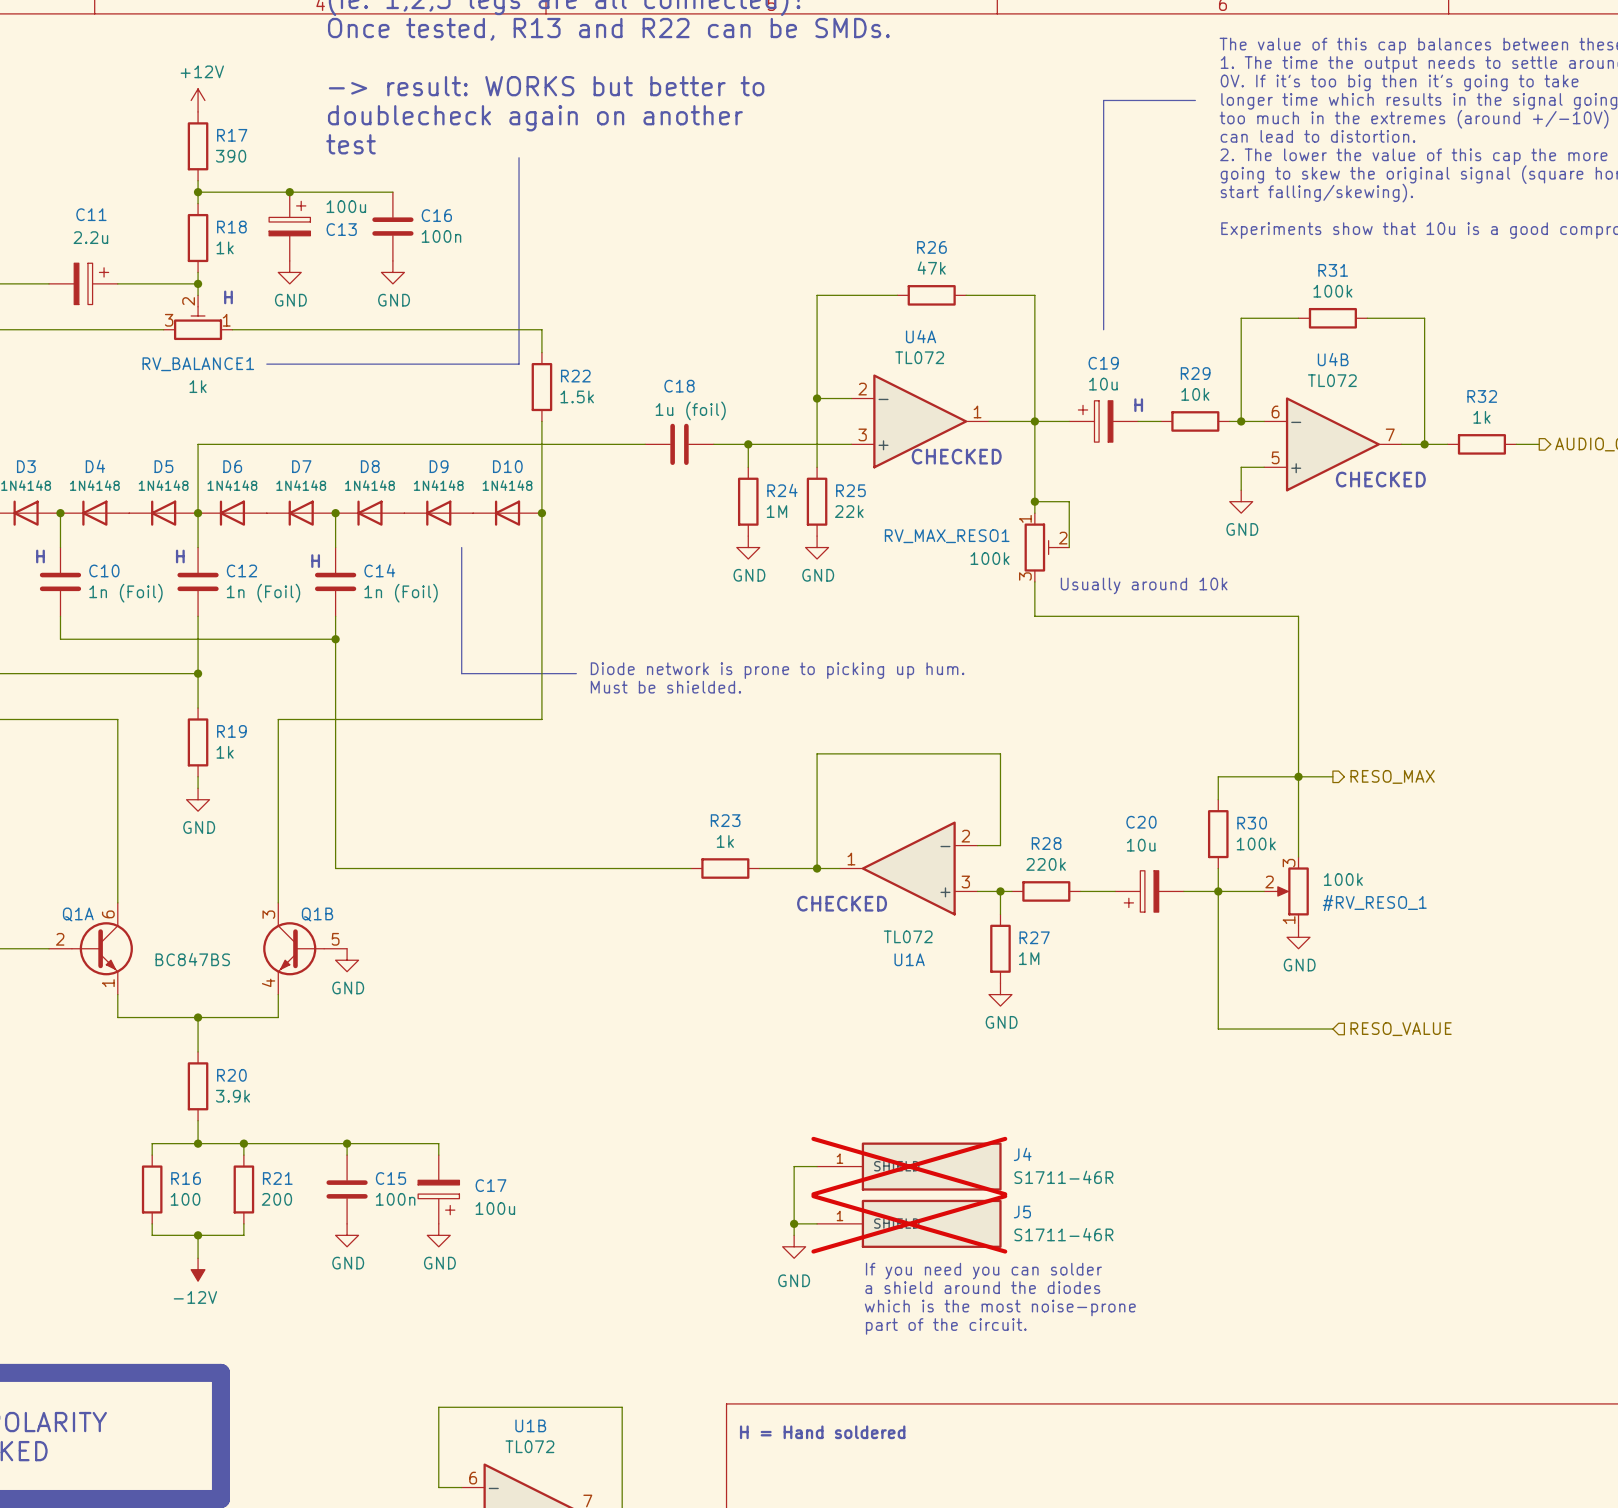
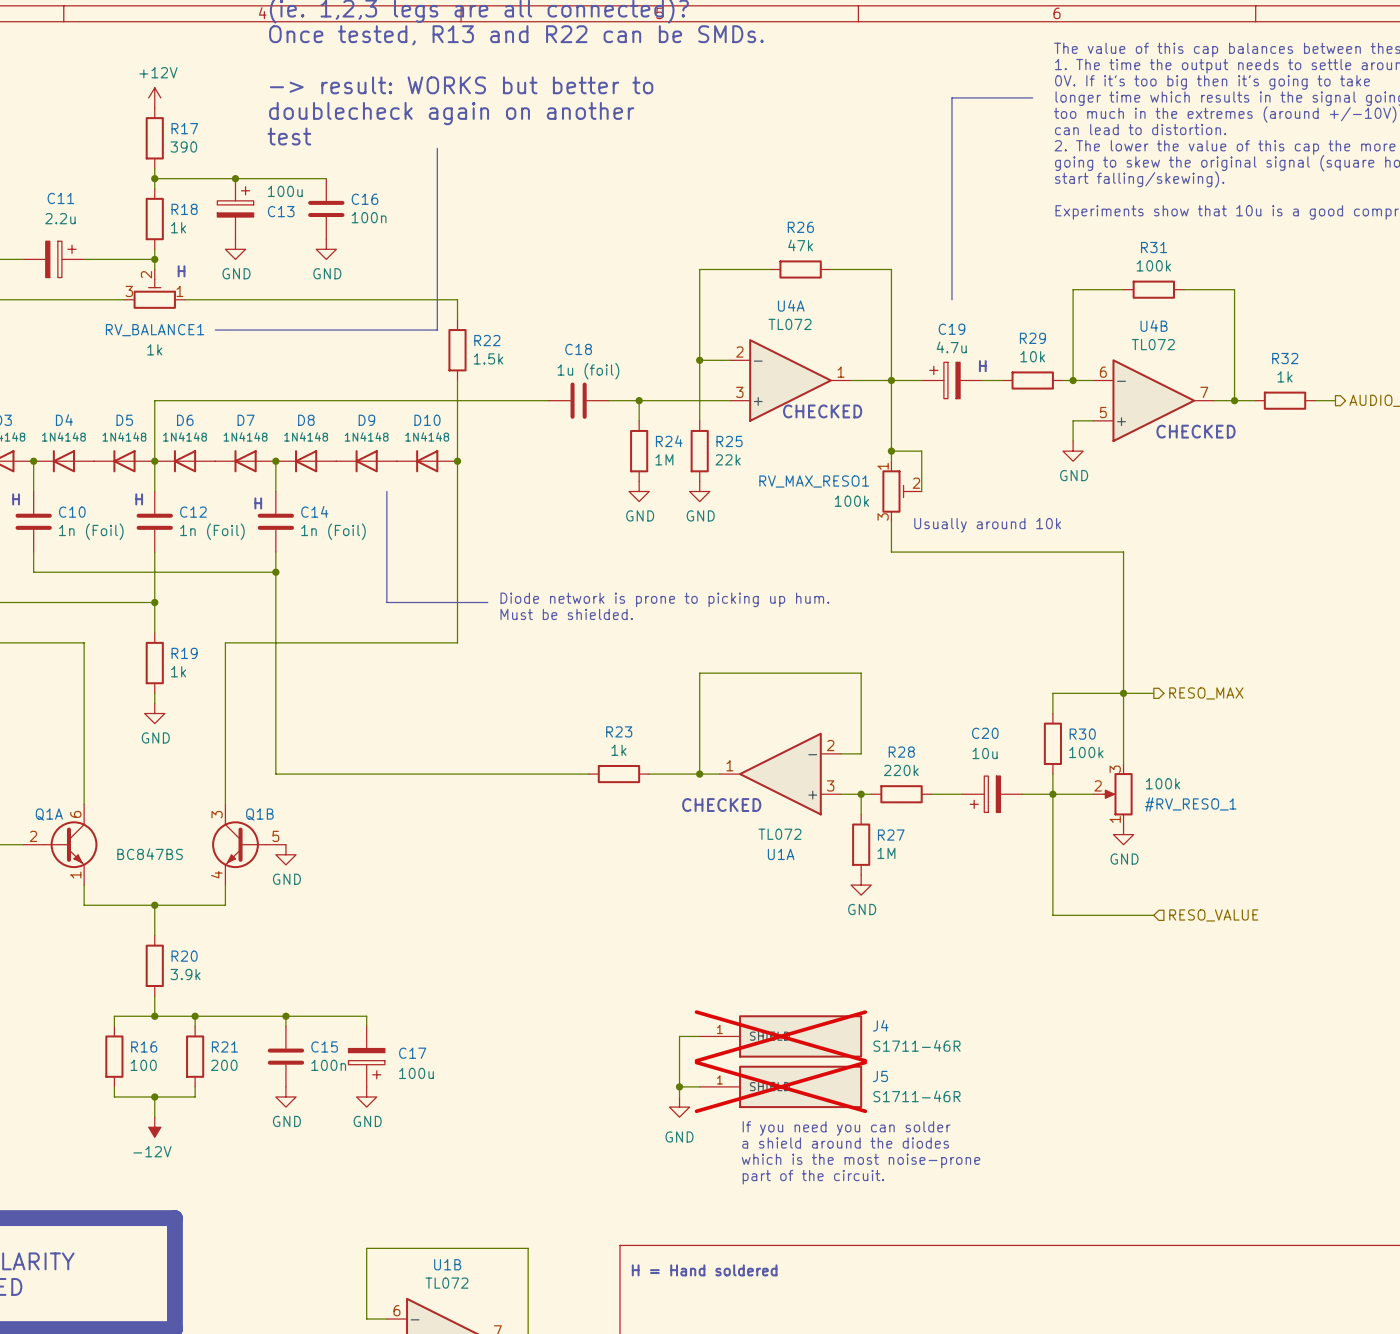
C19 value: 10u (1103, 384) -> 4.7u (951, 347)

